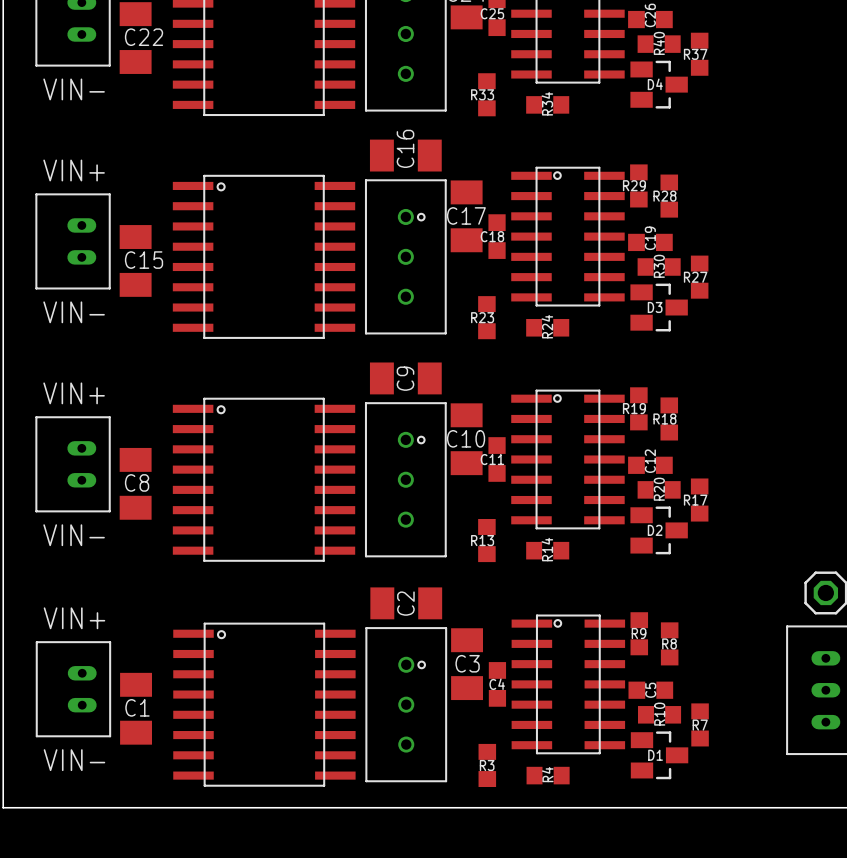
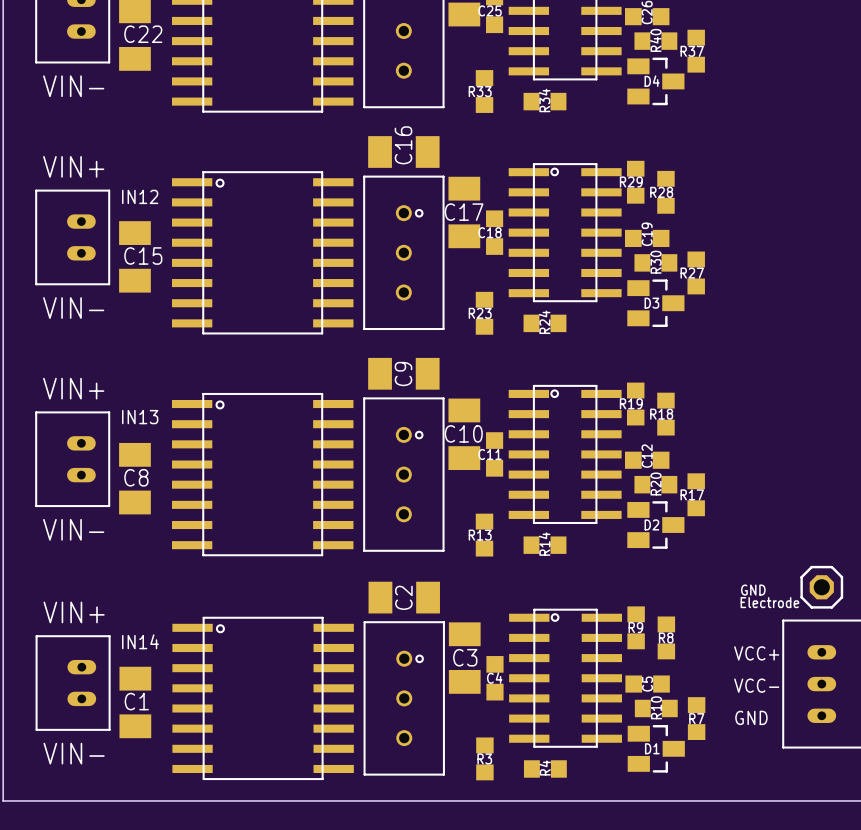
text: none -> IN12 (140, 196)
text: none -> IN13 (140, 417)
part value: none -> GND (753, 590)
text: none -> Electrode (769, 602)
text: none -> IN14 (140, 641)
text: none -> VCC+ (756, 653)
text: none -> VCC- (756, 685)
text: none -> GND (751, 717)

